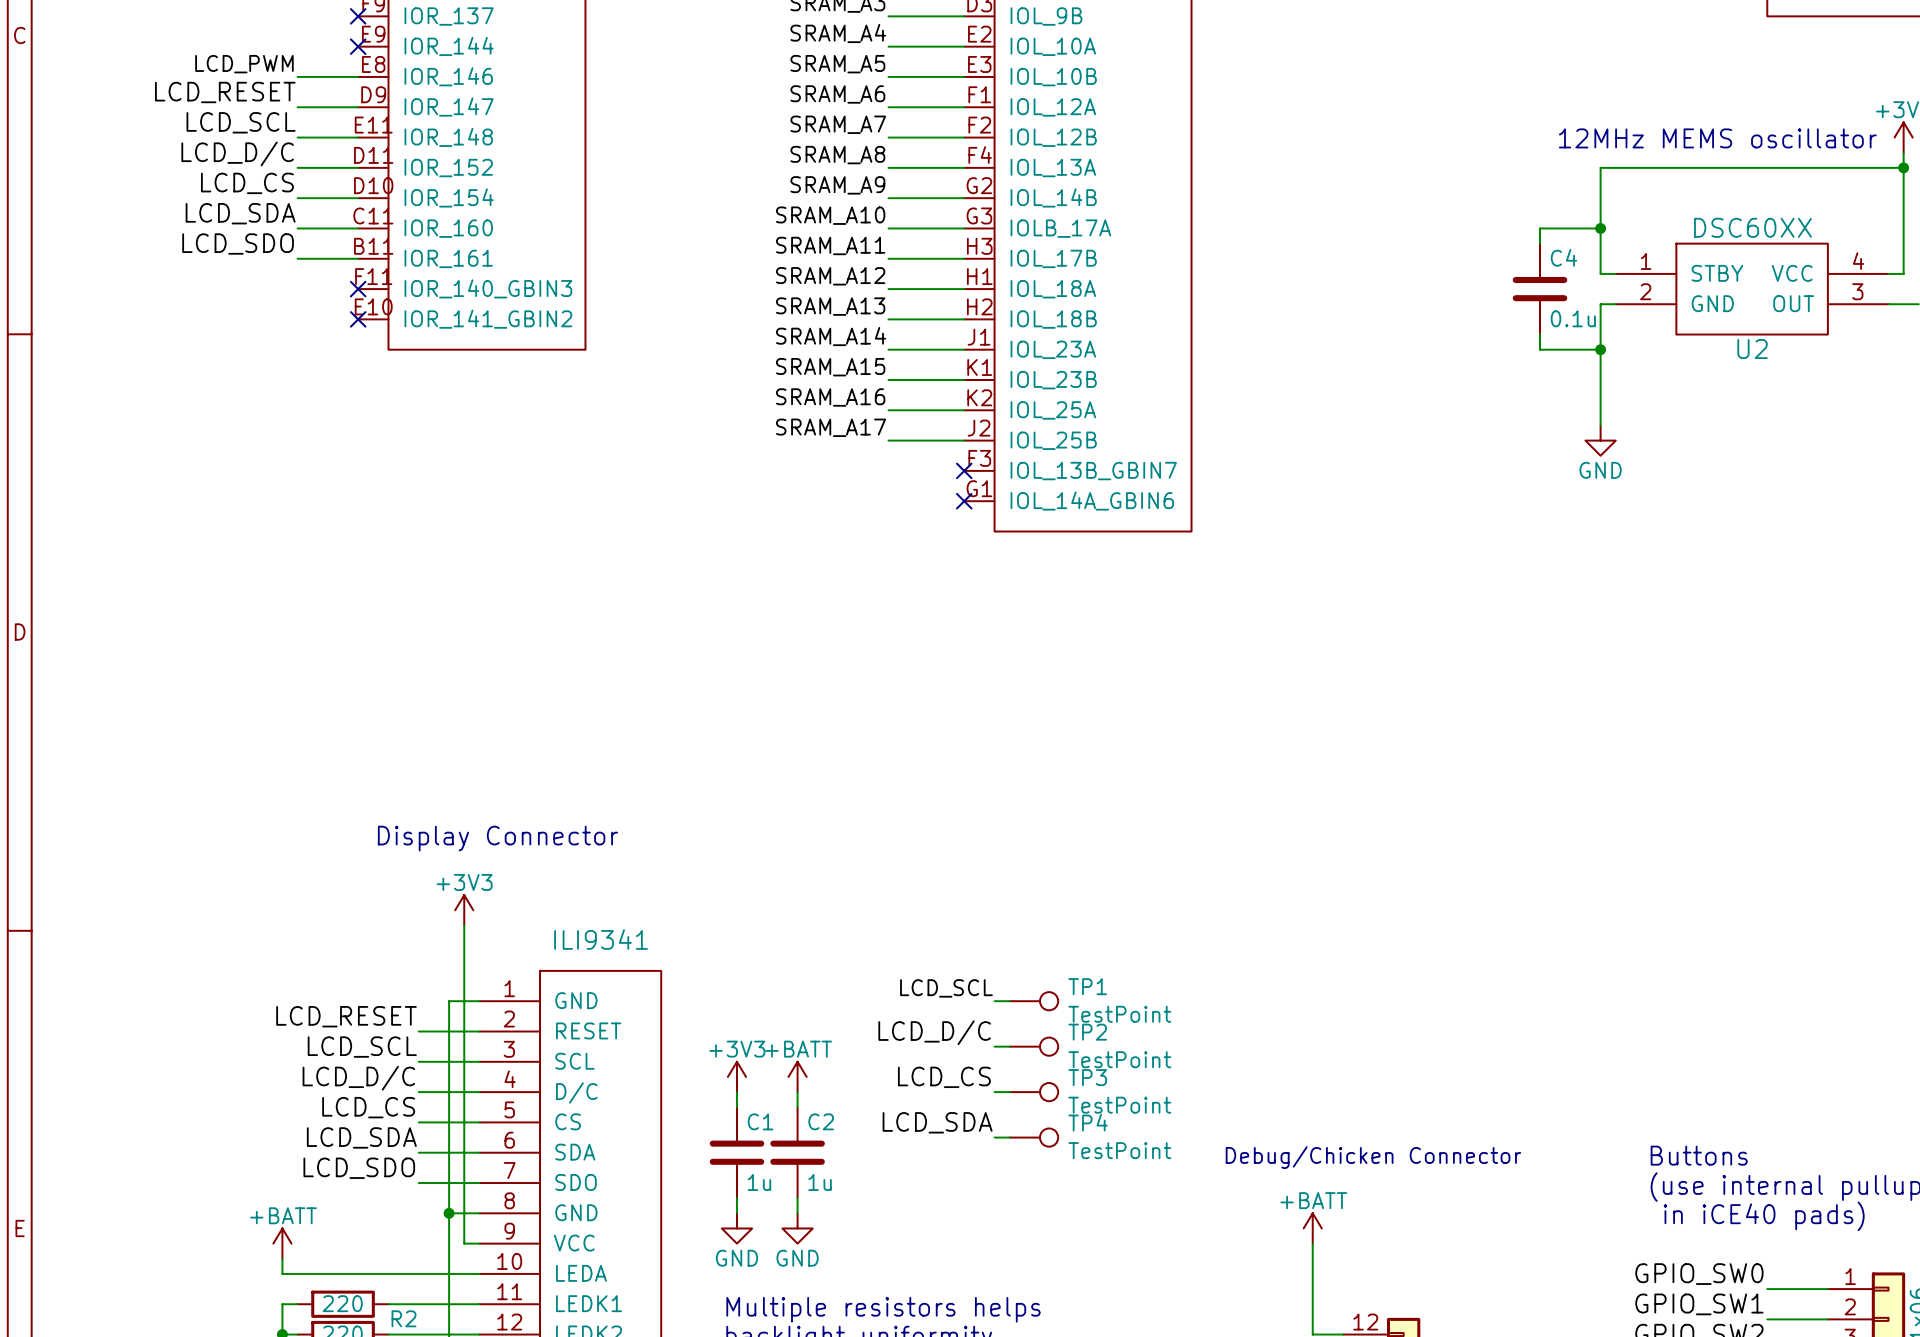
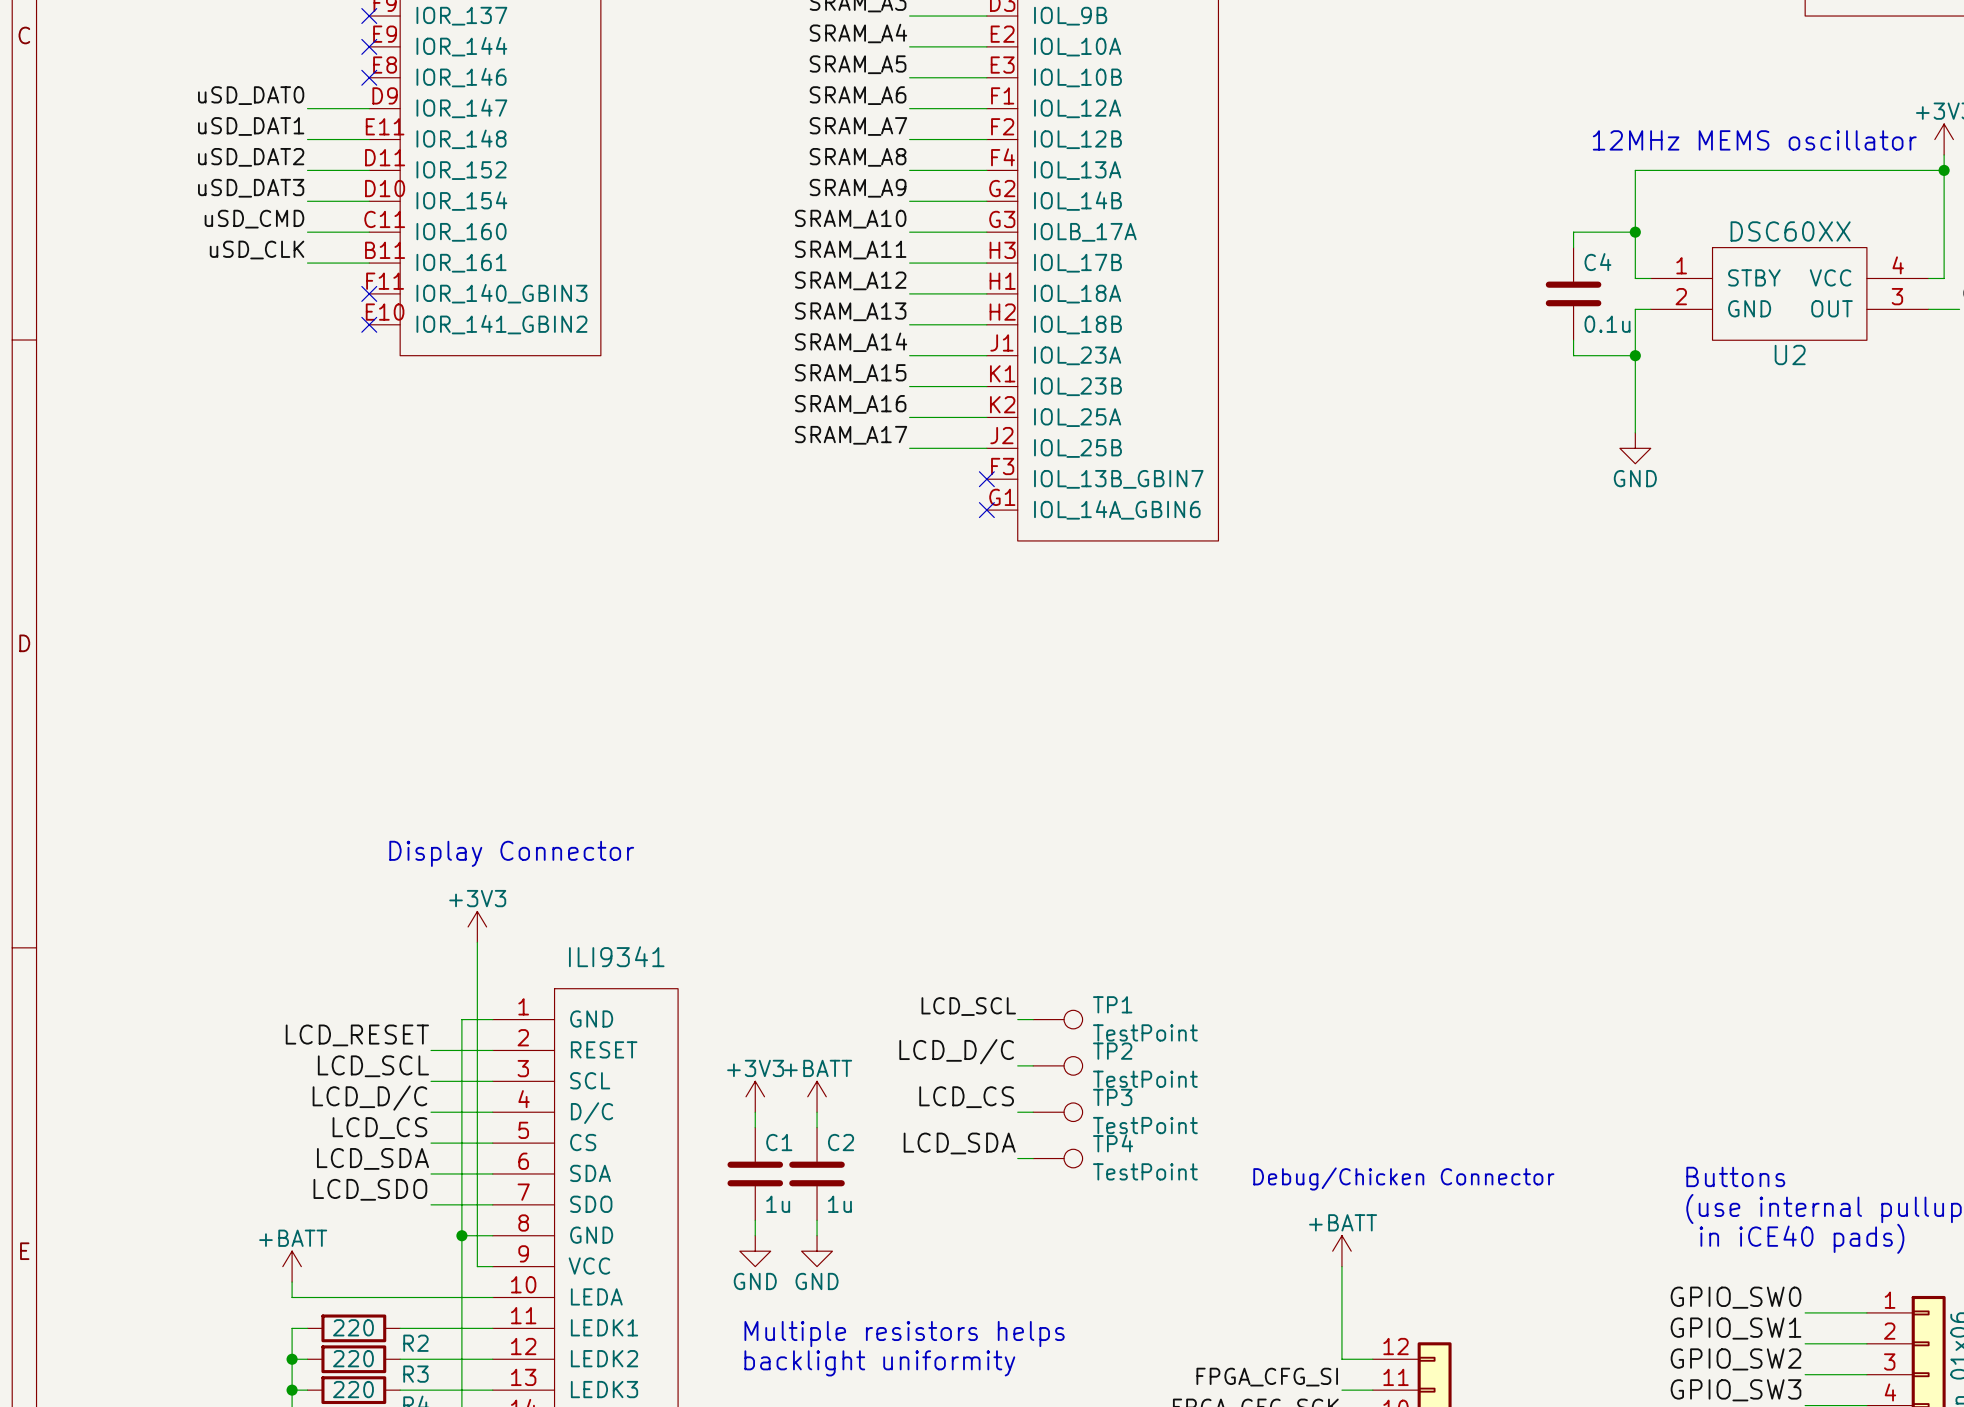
label: LCD_PWM (244, 64) -> none
wire: (297, 76) (358, 76) -> none
no-connect mark: none -> (369, 77)
label: LCD_RESET (225, 92) -> uSD_DAT0 (251, 95)
label: LCD_SCL (241, 122) -> uSD_DAT1 (251, 126)
label: LCD_D/C (237, 153) -> uSD_DAT2 (251, 157)
label: LCD_CS (247, 183) -> uSD_DAT3 (251, 188)
label: LCD_SDA (240, 213) -> uSD_CMD (254, 219)
label: LCD_SDO (238, 244) -> uSD_CLK (257, 250)

